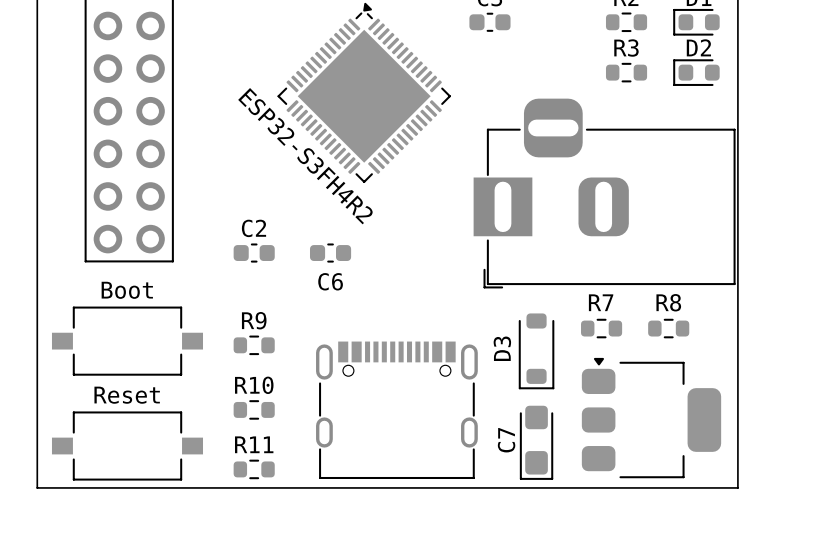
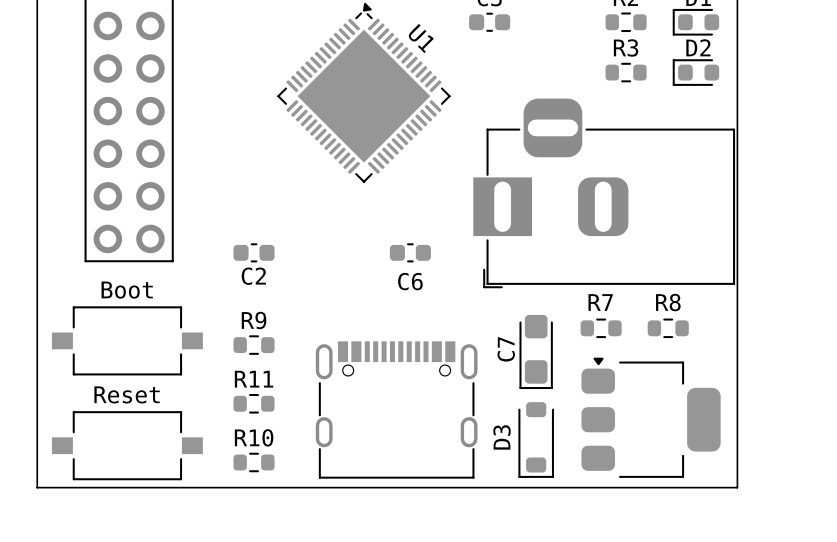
ESP32-S3FH4R2 name: ESP32-S3FH4R2 (305, 156) -> U1 (421, 38)
C2 name position: C2 (253, 228) -> C2 (253, 276)
C6 position: (330, 253) -> (410, 252)
D3 position: (536, 351) -> (536, 440)
R10 position: (254, 409) -> (254, 462)
C7 position: (536, 442) -> (536, 351)
R11 position: (254, 469) -> (254, 403)

